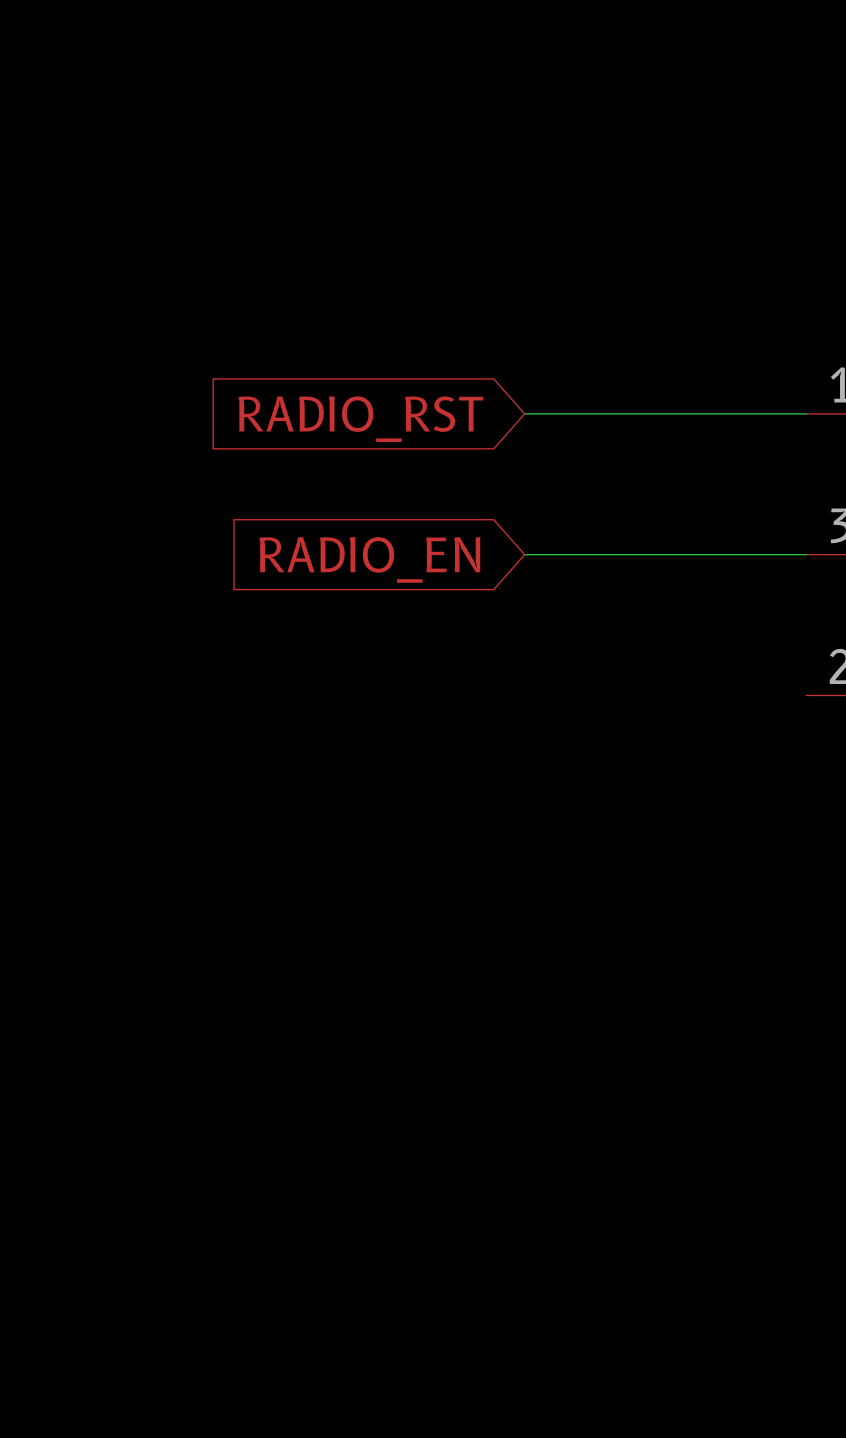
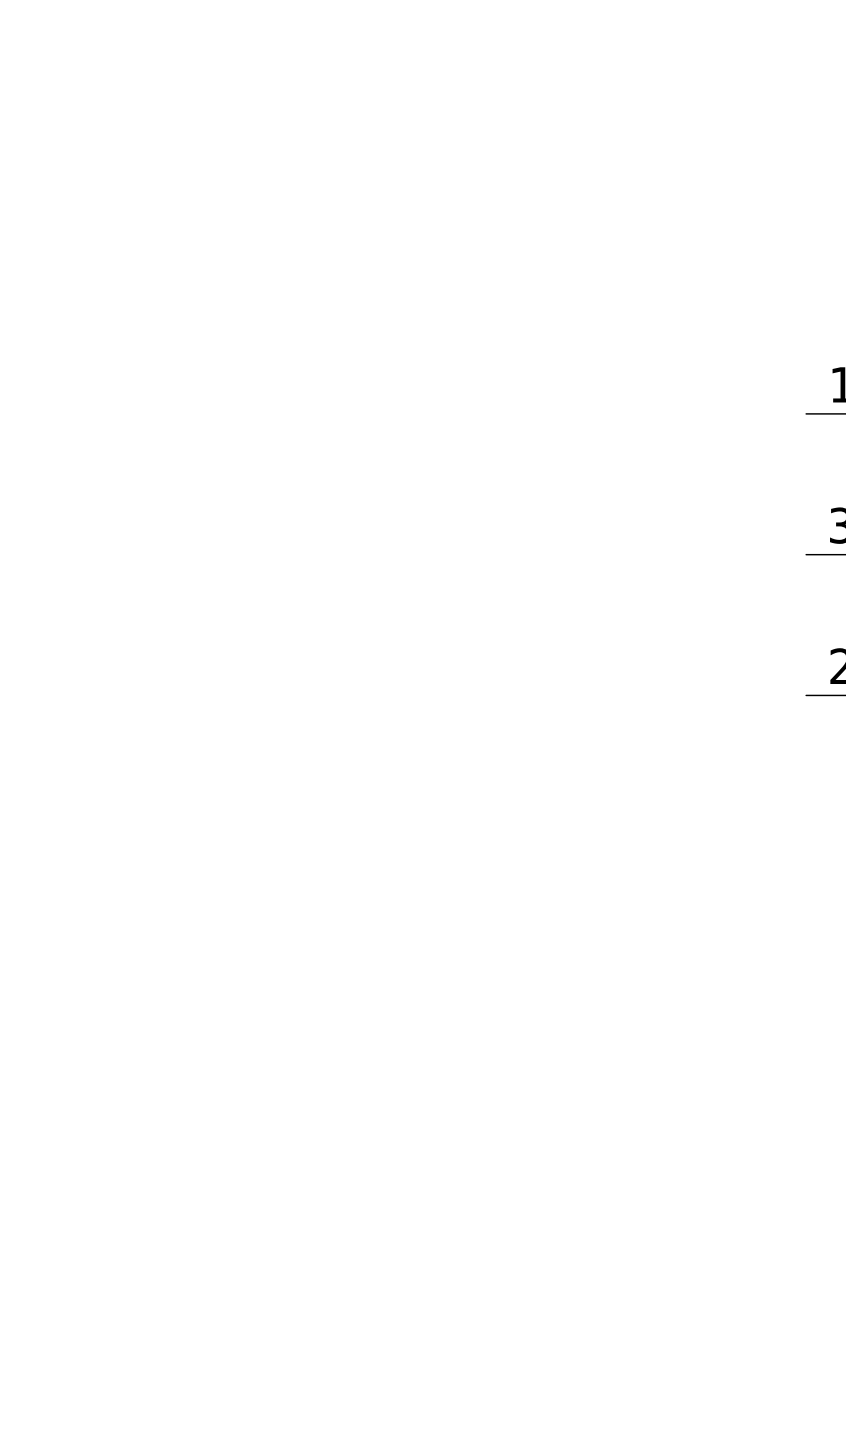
wire: (524, 413) (806, 413) -> none
global label: RADIO_RST (360, 419) -> none
wire: (524, 554) (806, 554) -> none
global label: RADIO_EN (369, 559) -> none

